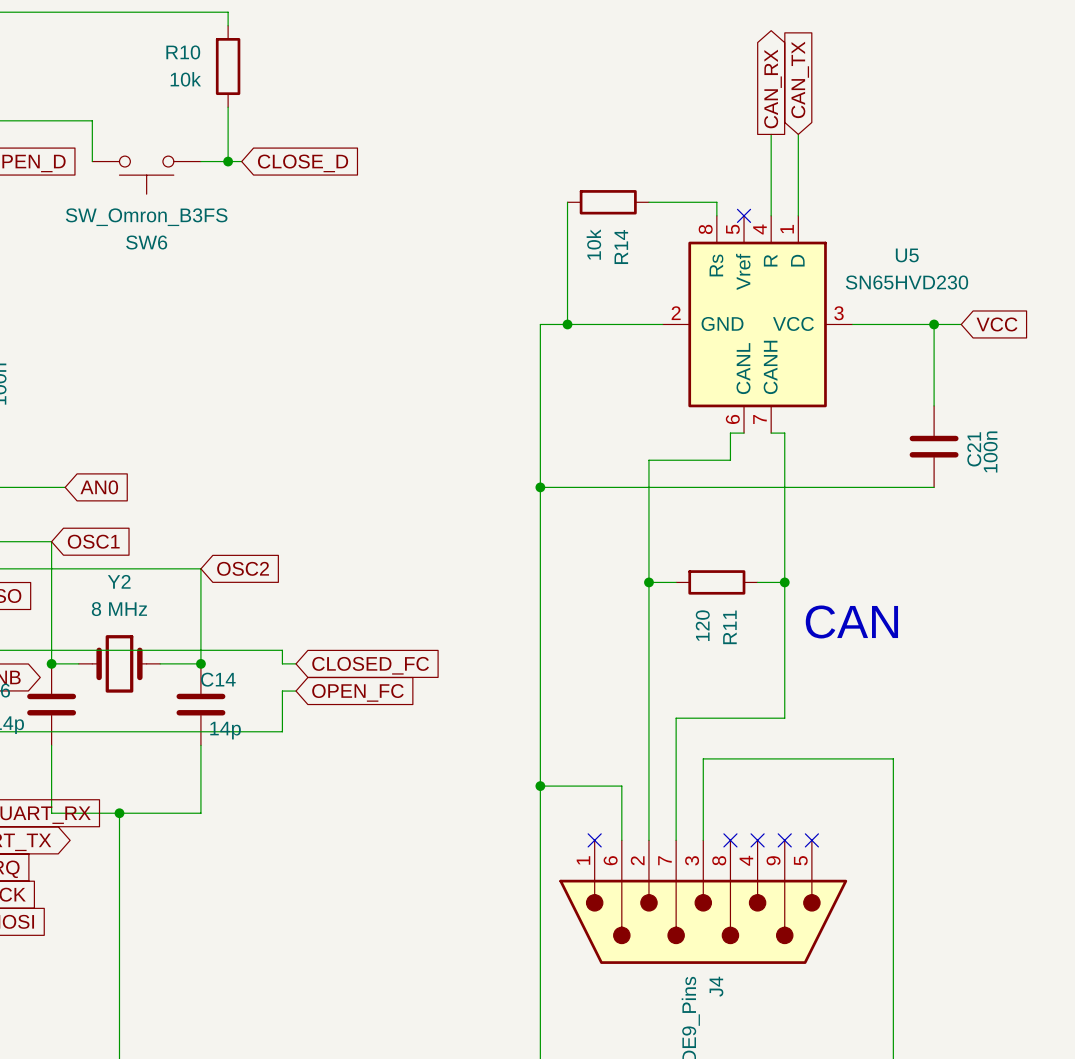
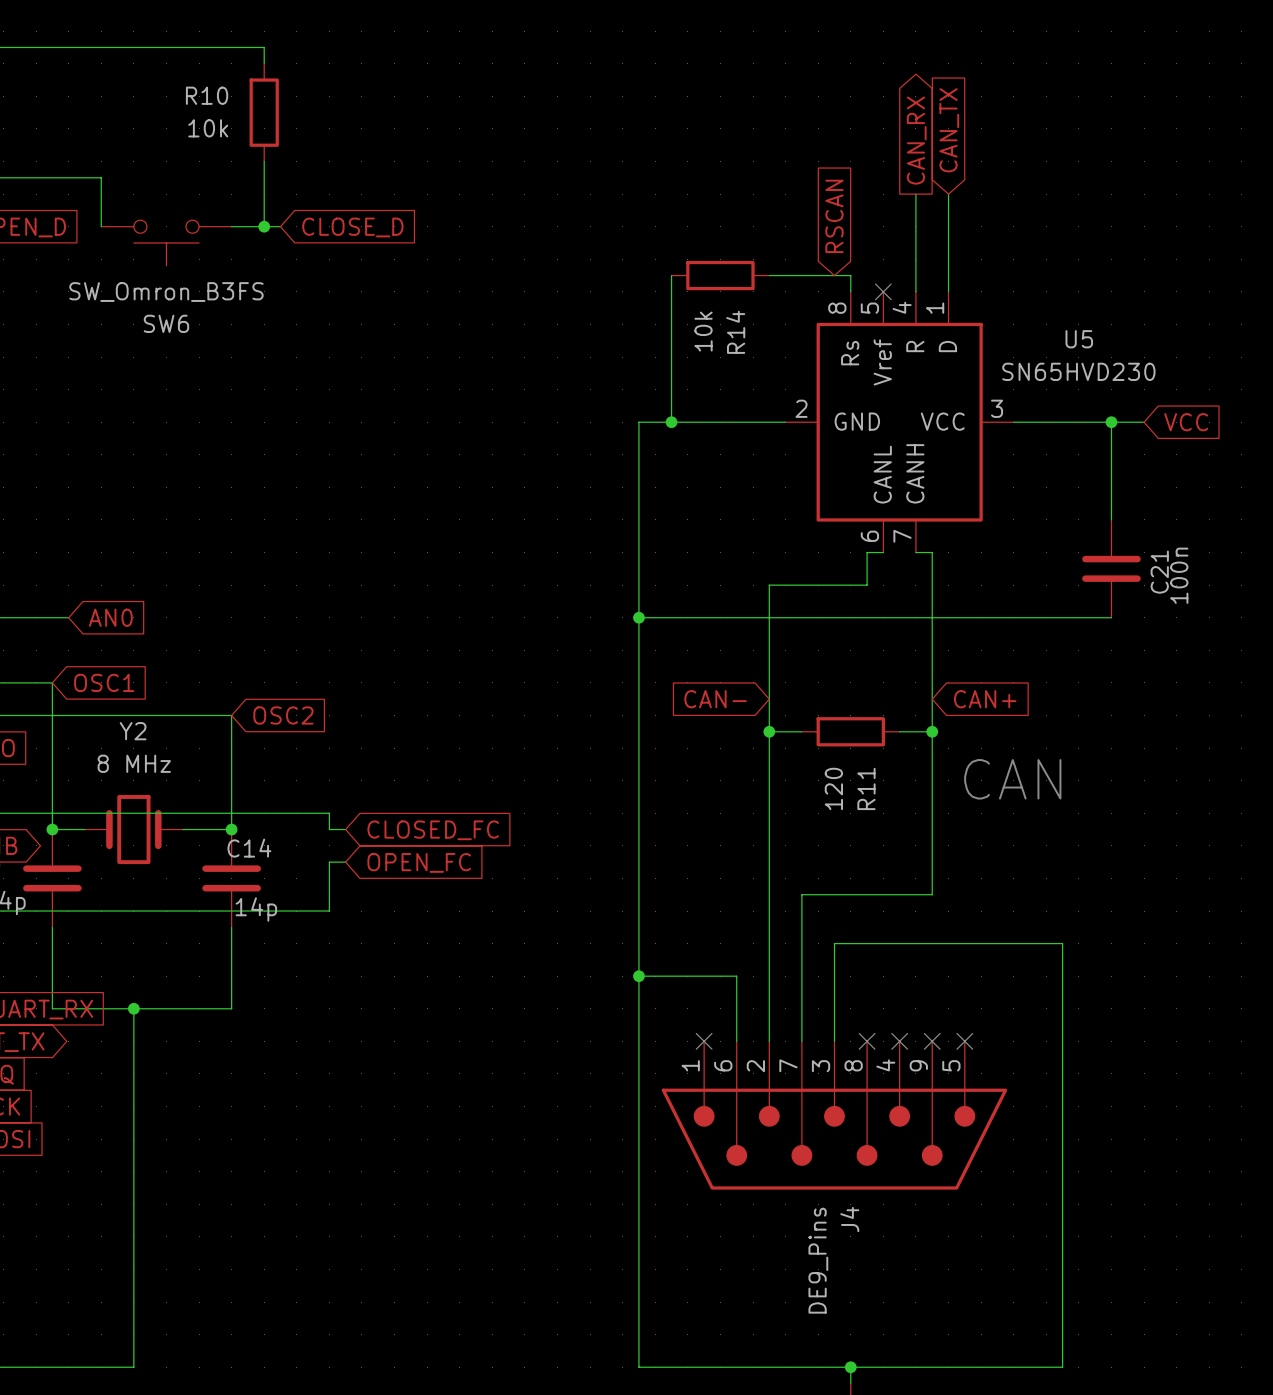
global label: none -> RSCAN (834, 216)
global label: none -> CAN- (715, 699)
global label: none -> CAN+ (985, 699)

